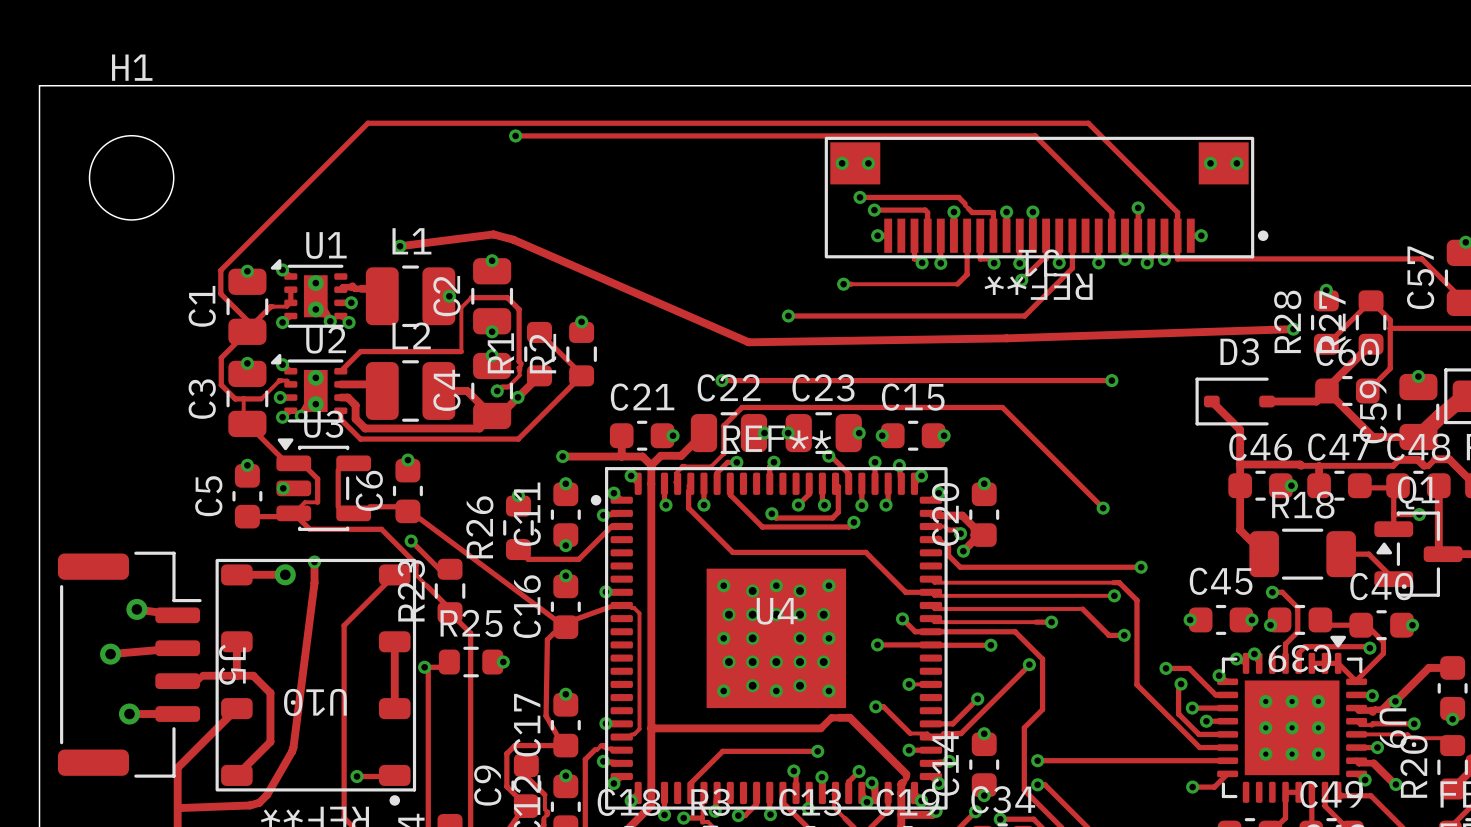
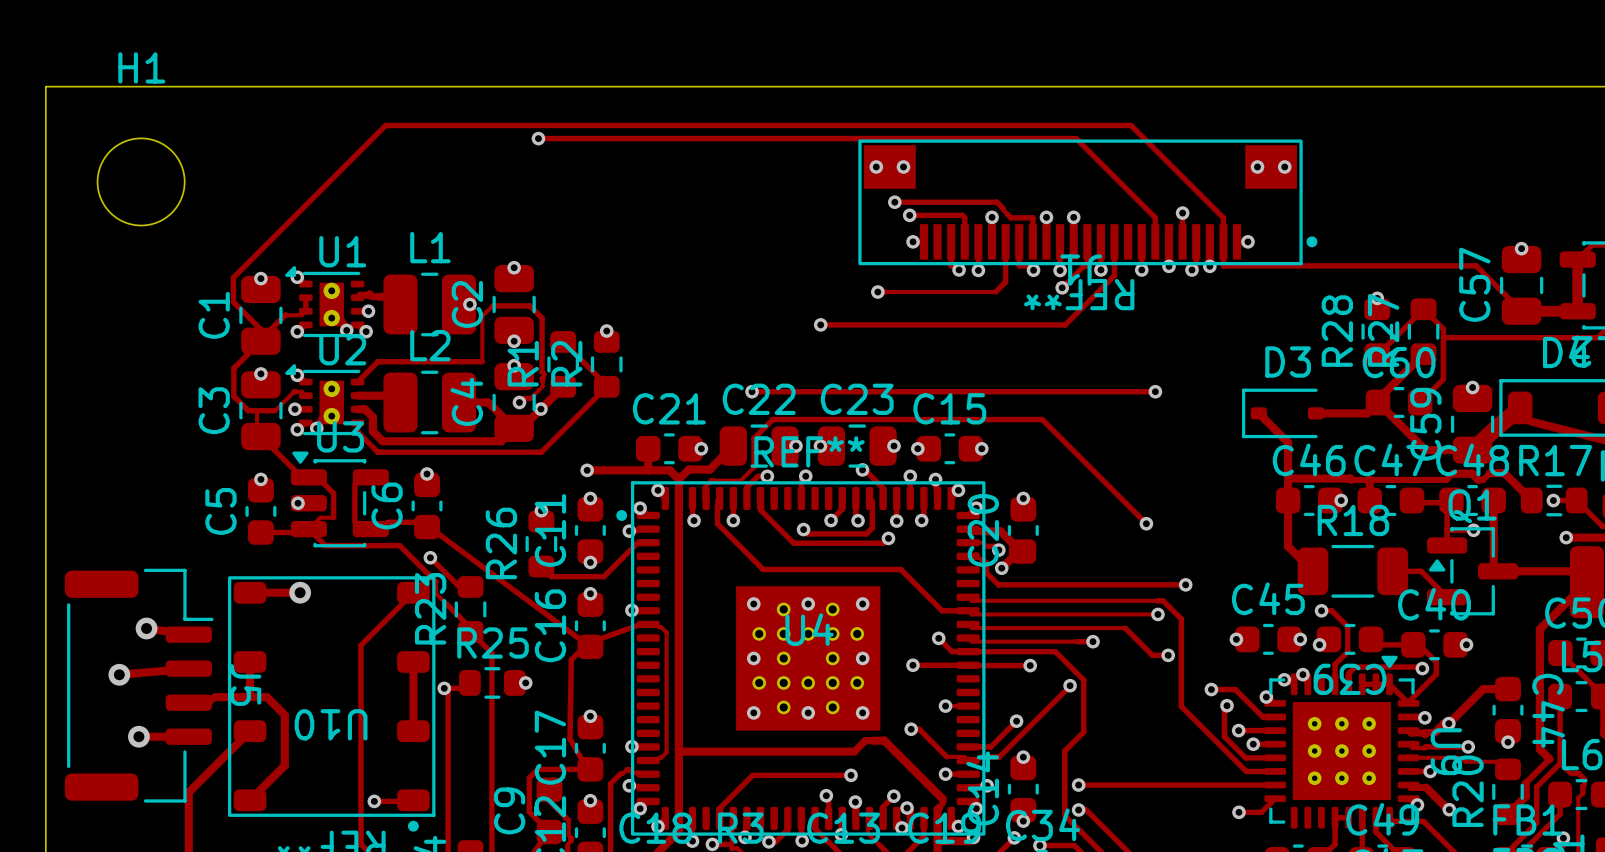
track: (400, 246) (493, 234) (513, 239) (748, 342) (1006, 338) (1293, 329) -> none
via: (400, 246) -> none
via: (1293, 329) -> none
track: (314, 562) (314, 583) (292, 751) (267, 794) (259, 802) (250, 805) (178, 808) -> none
via: (314, 562) -> none

